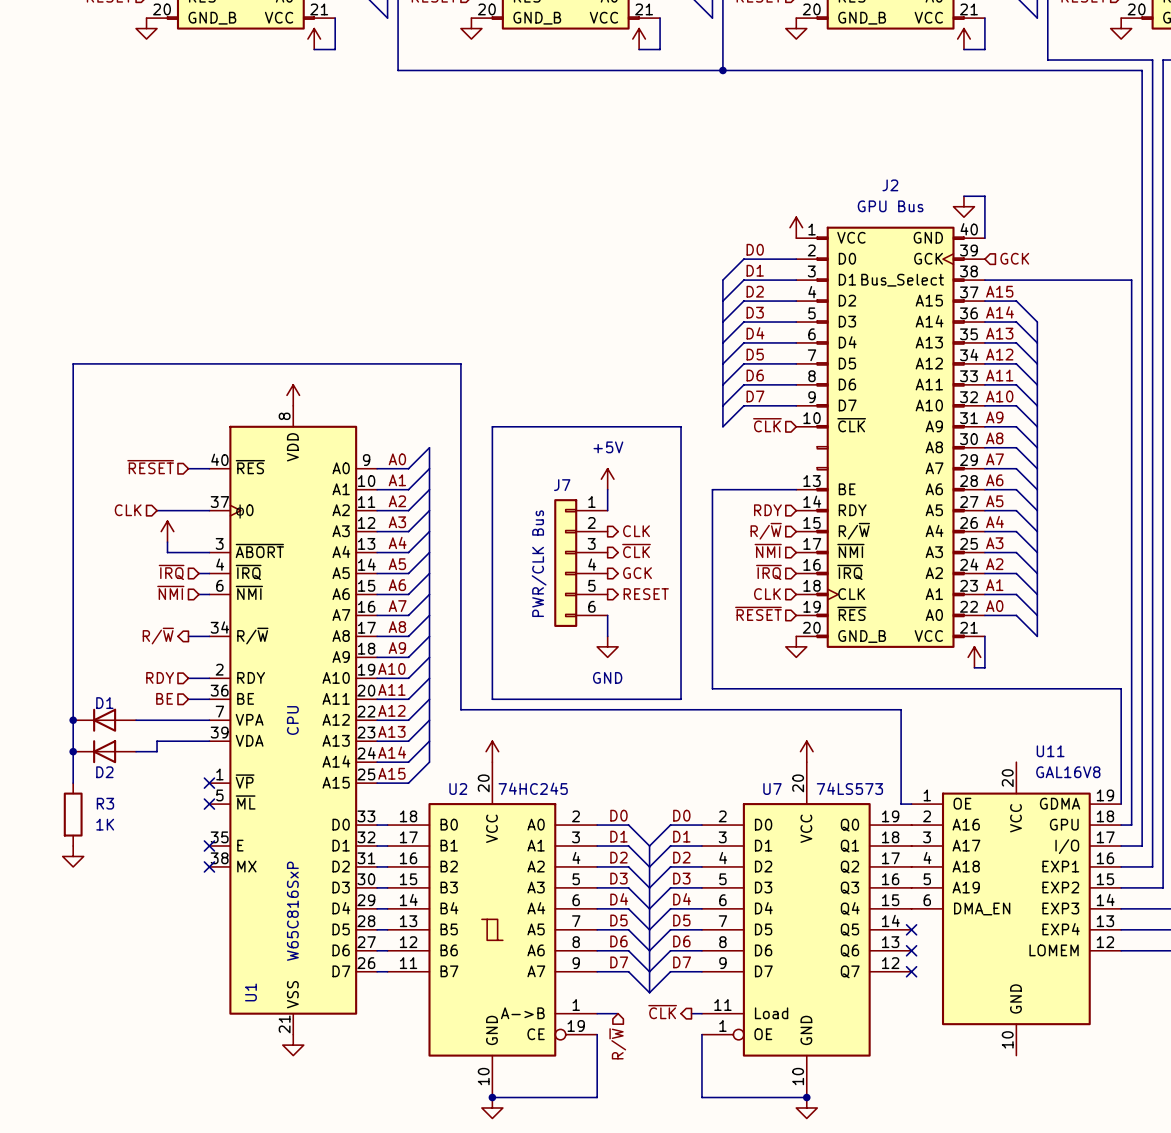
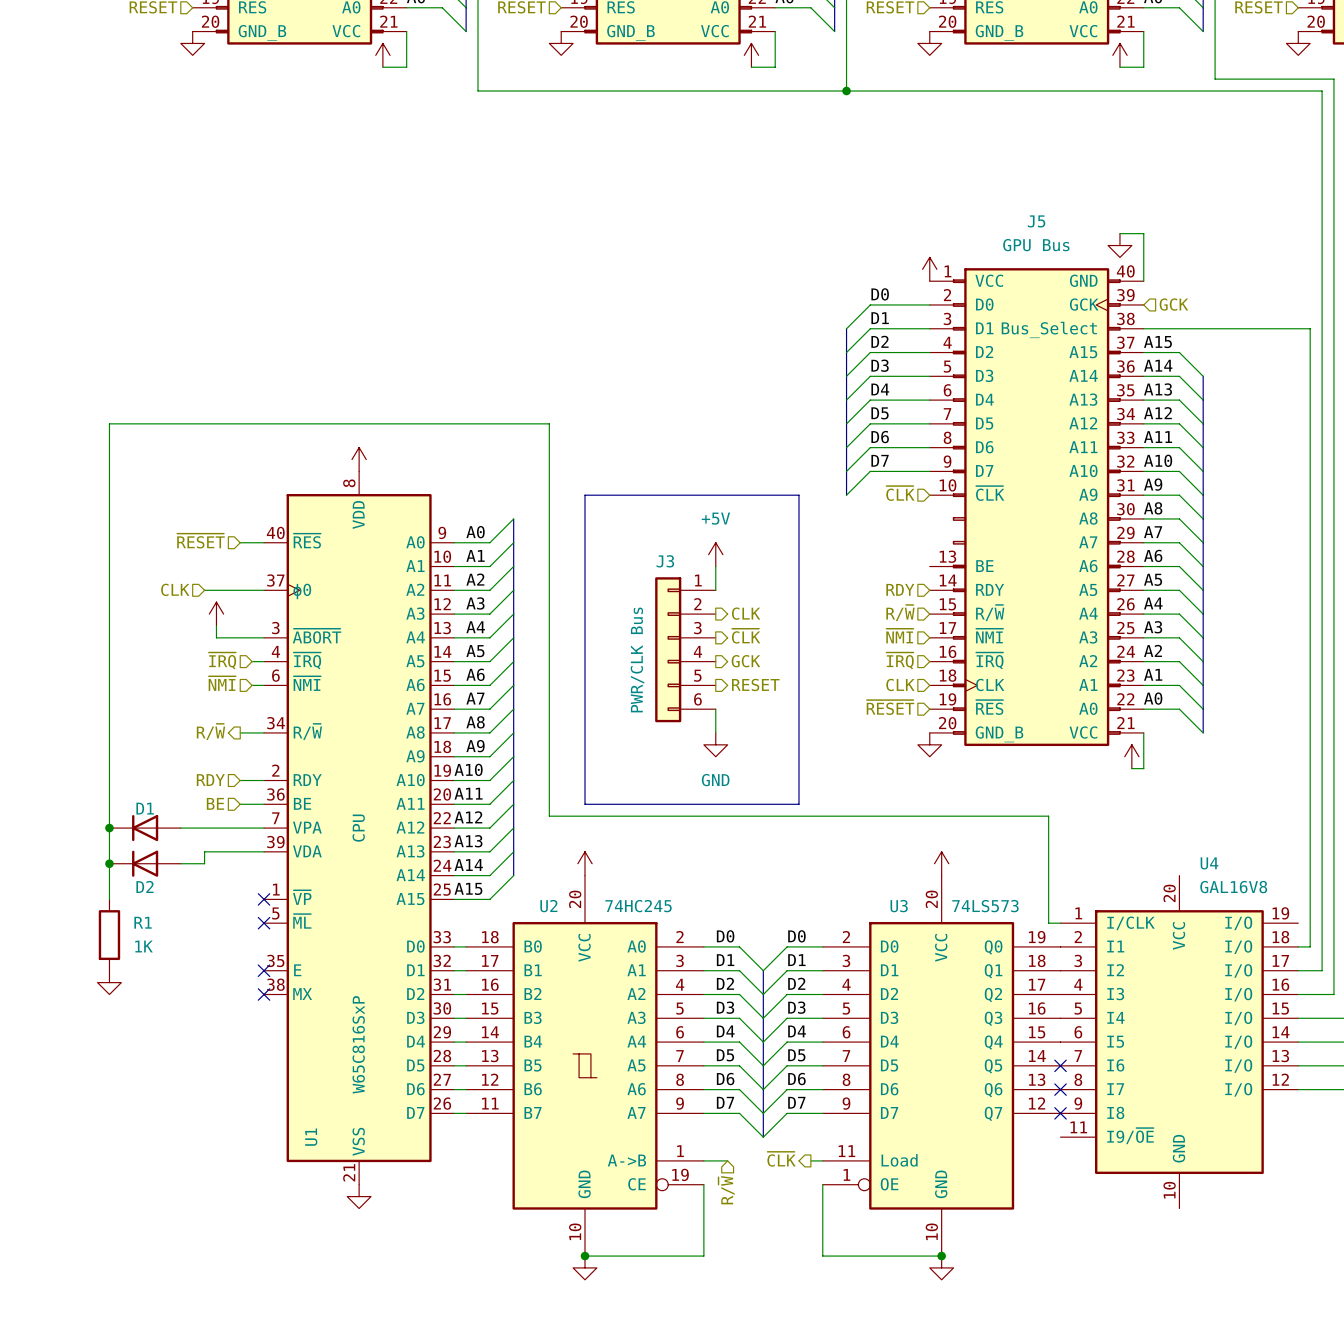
J2 name: J2 (890, 185) -> J5 (1036, 221)
J7 name: J7 (562, 485) -> J3 (665, 561)
wire: (796, 489) (712, 489) (712, 688) (1121, 688) (1121, 804) -> none
U7 name: U7 (772, 789) -> U3 (899, 906)
R3 name: R3 (105, 803) -> R1 (143, 922)
U11: GAL16V8 (1016, 908) -> none
U4: none -> GAL16V8 (1179, 1042)

